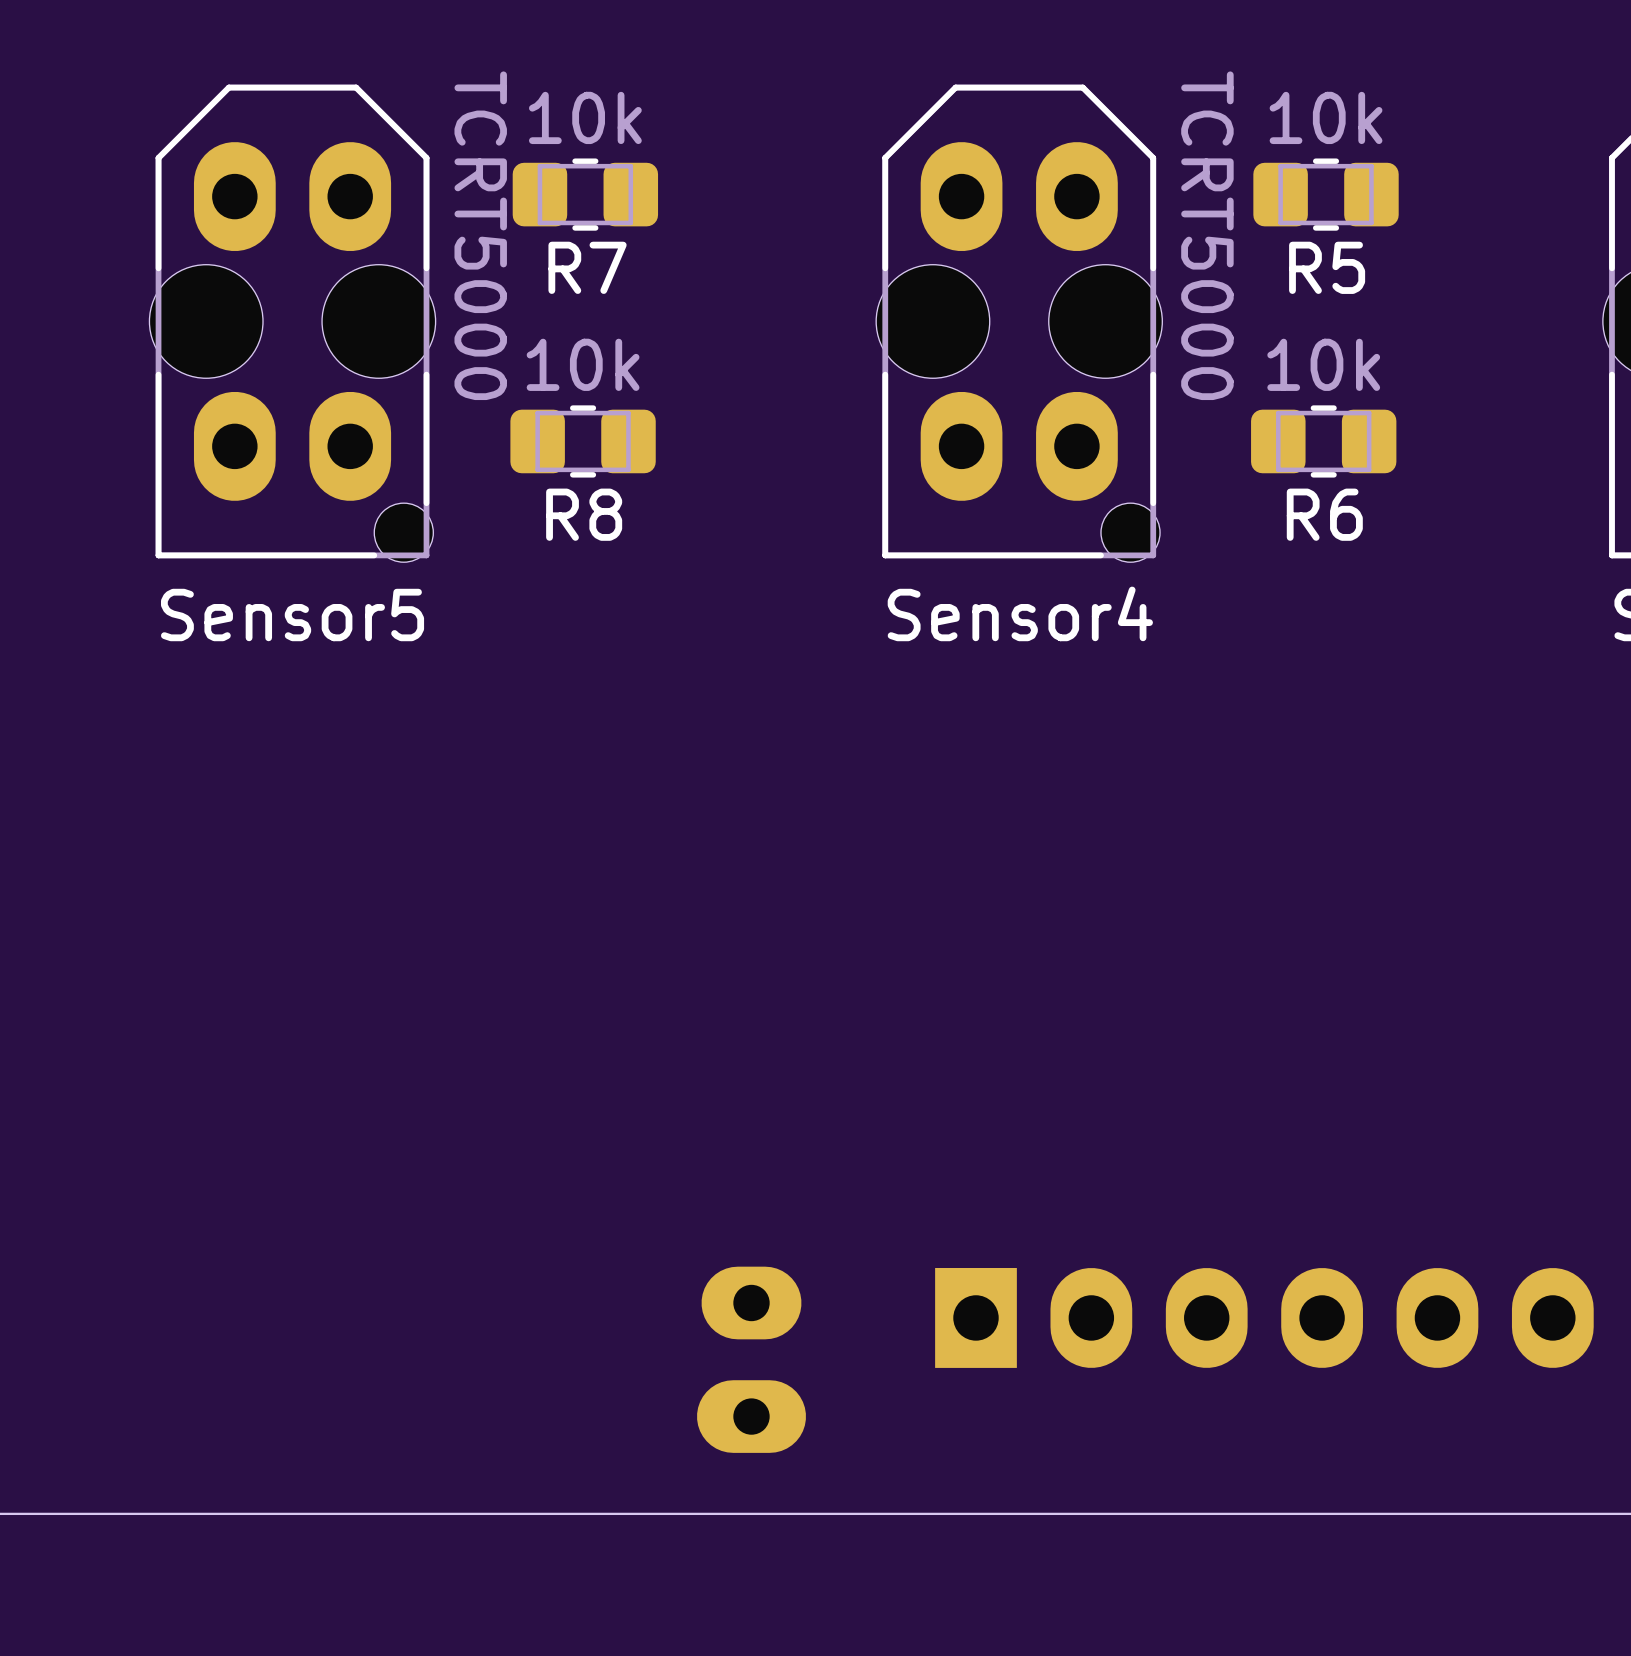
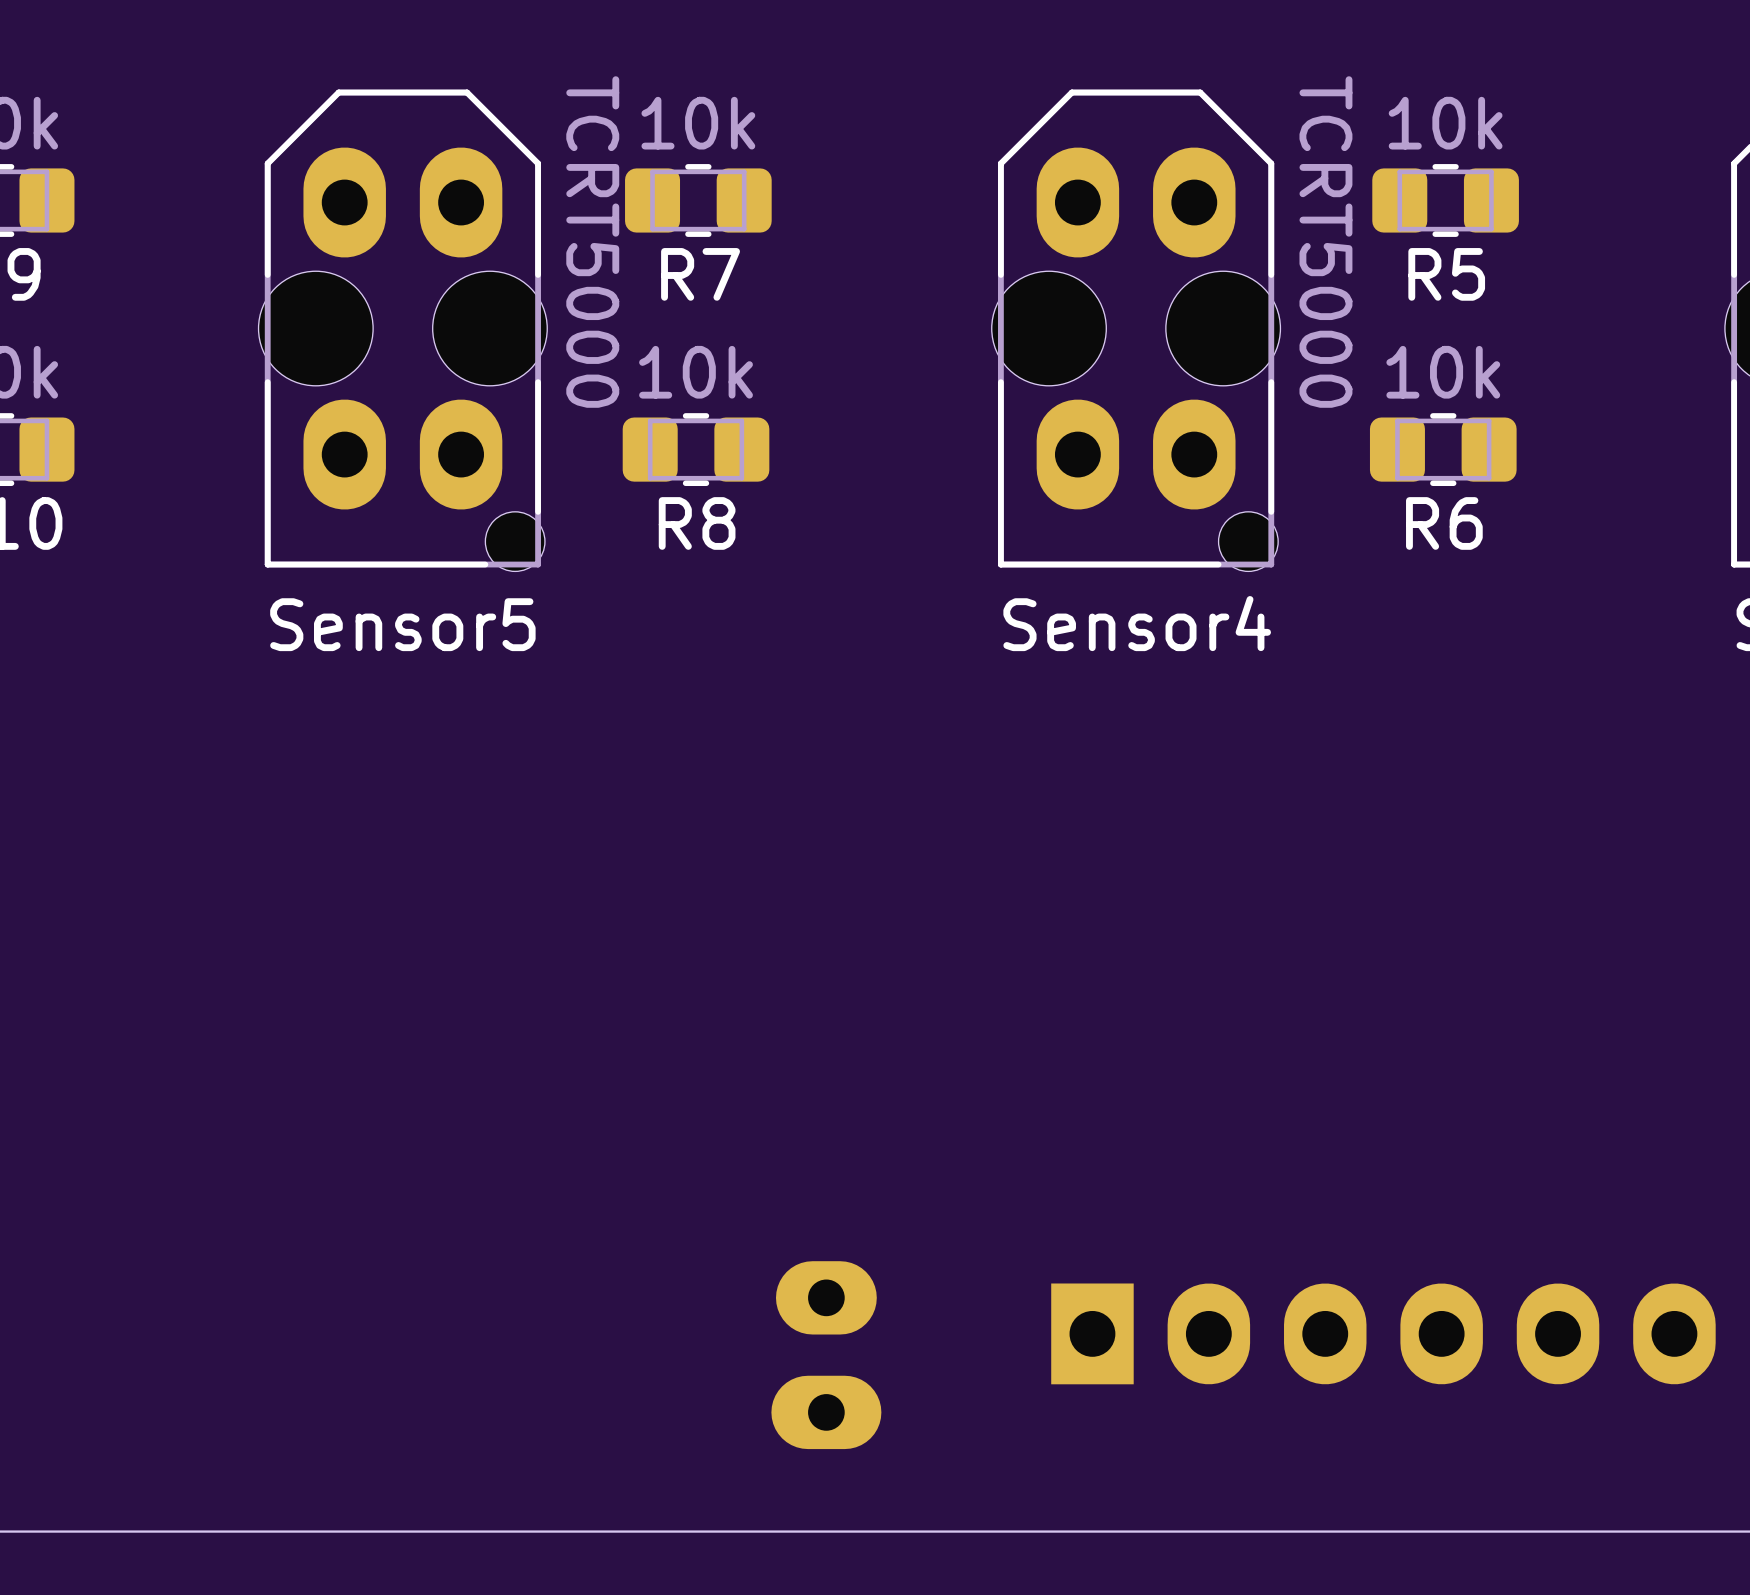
part position: (751, 1359) -> (826, 1355)

